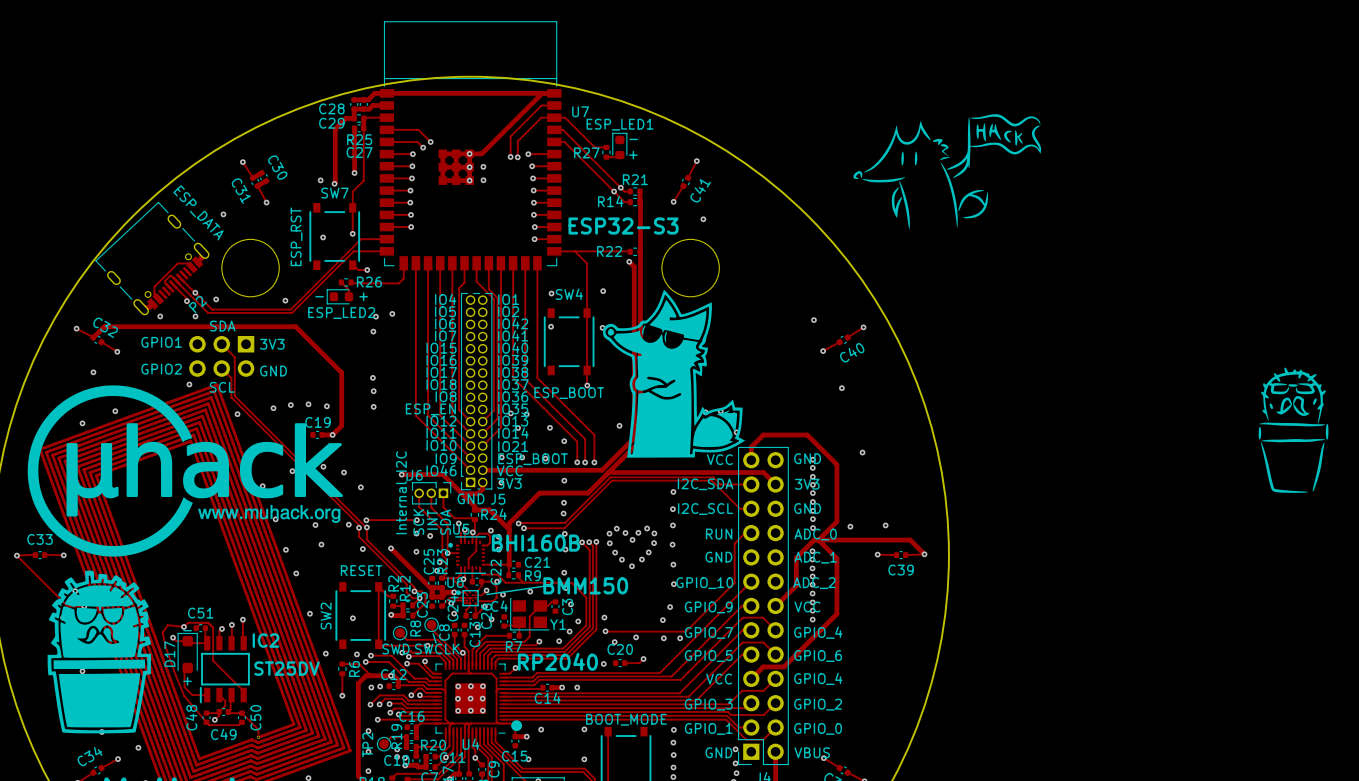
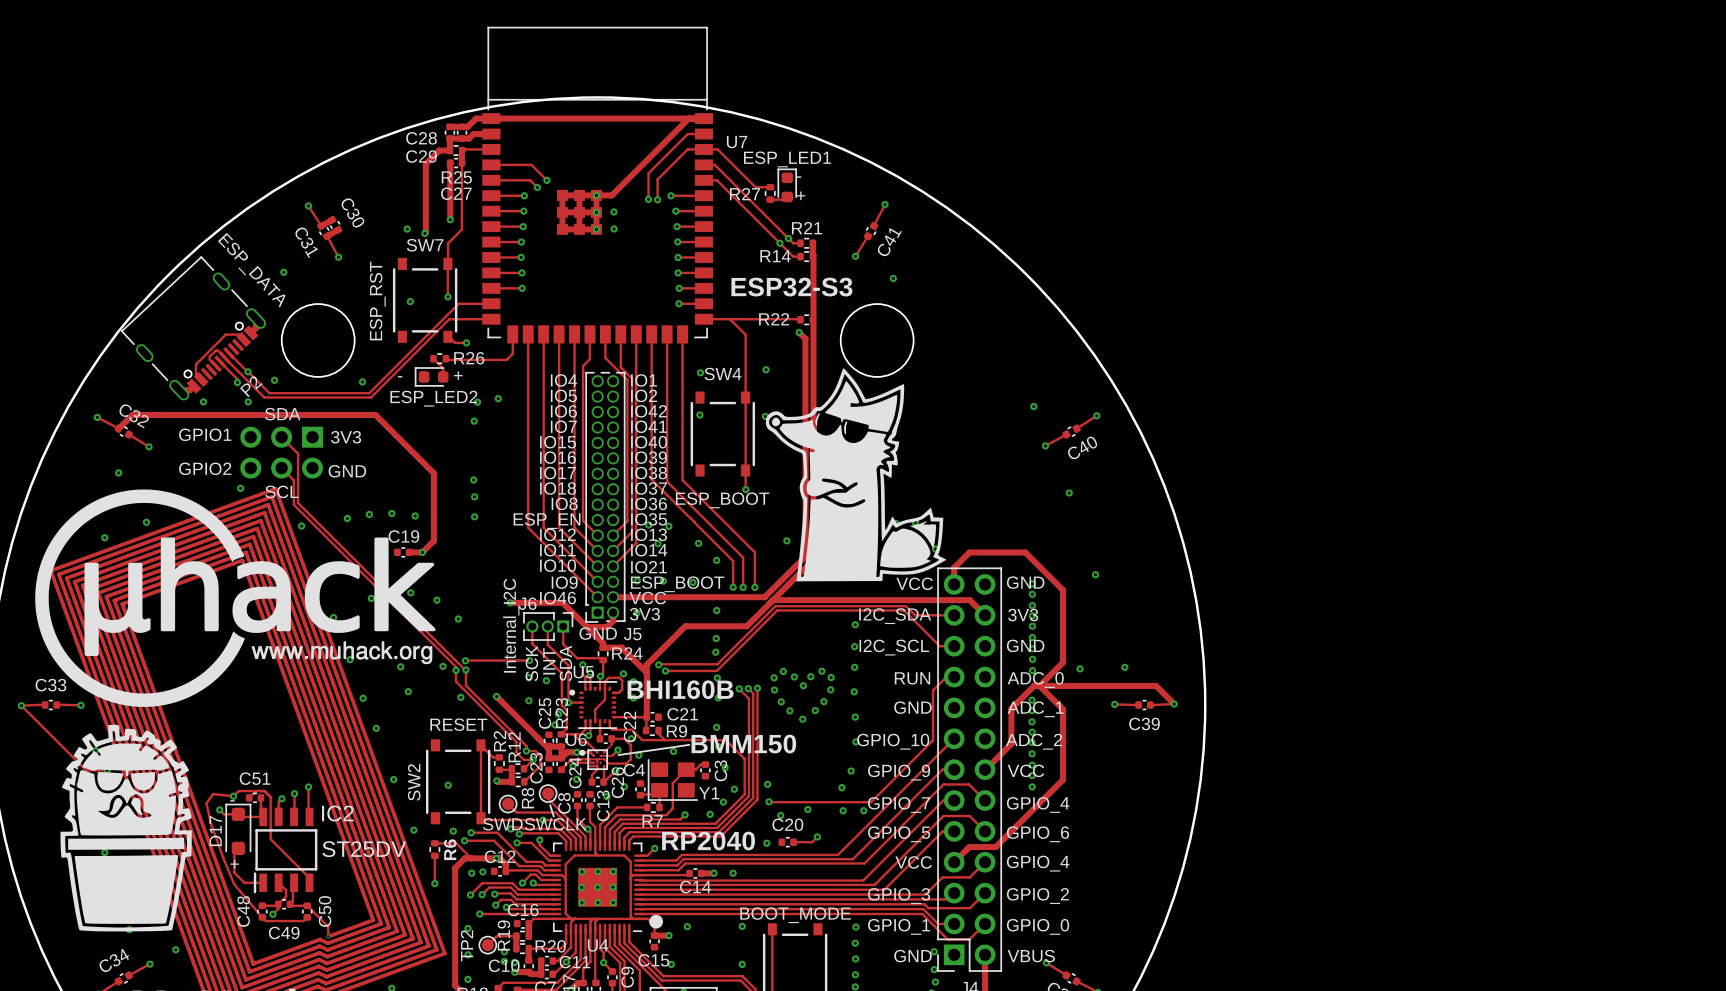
drawing: [853, 114, 1042, 230] -> none
drawing: [1258, 367, 1329, 493] -> none

